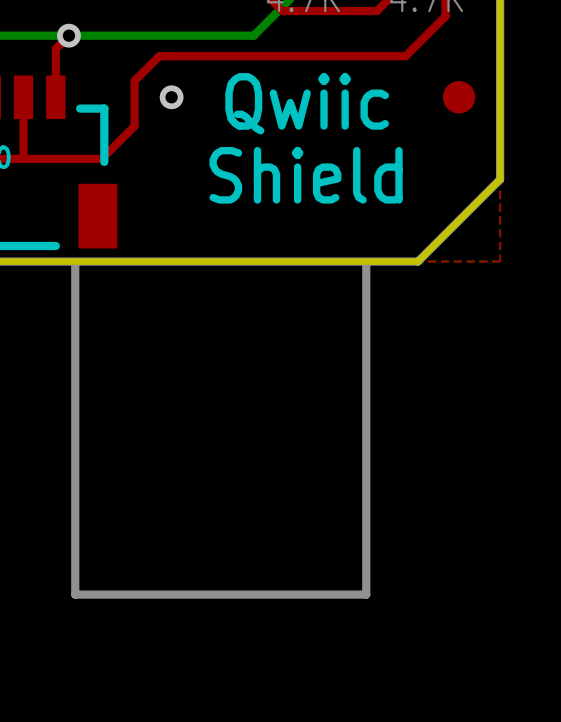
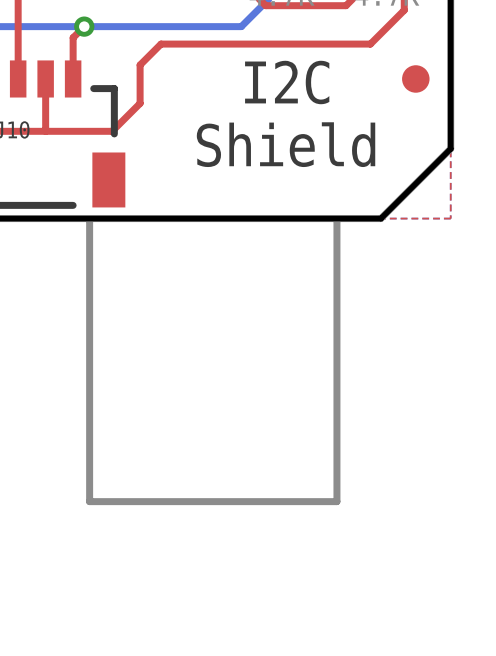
via: (171, 97) -> none
text: Qwiic (307, 103) -> I2C (287, 82)

